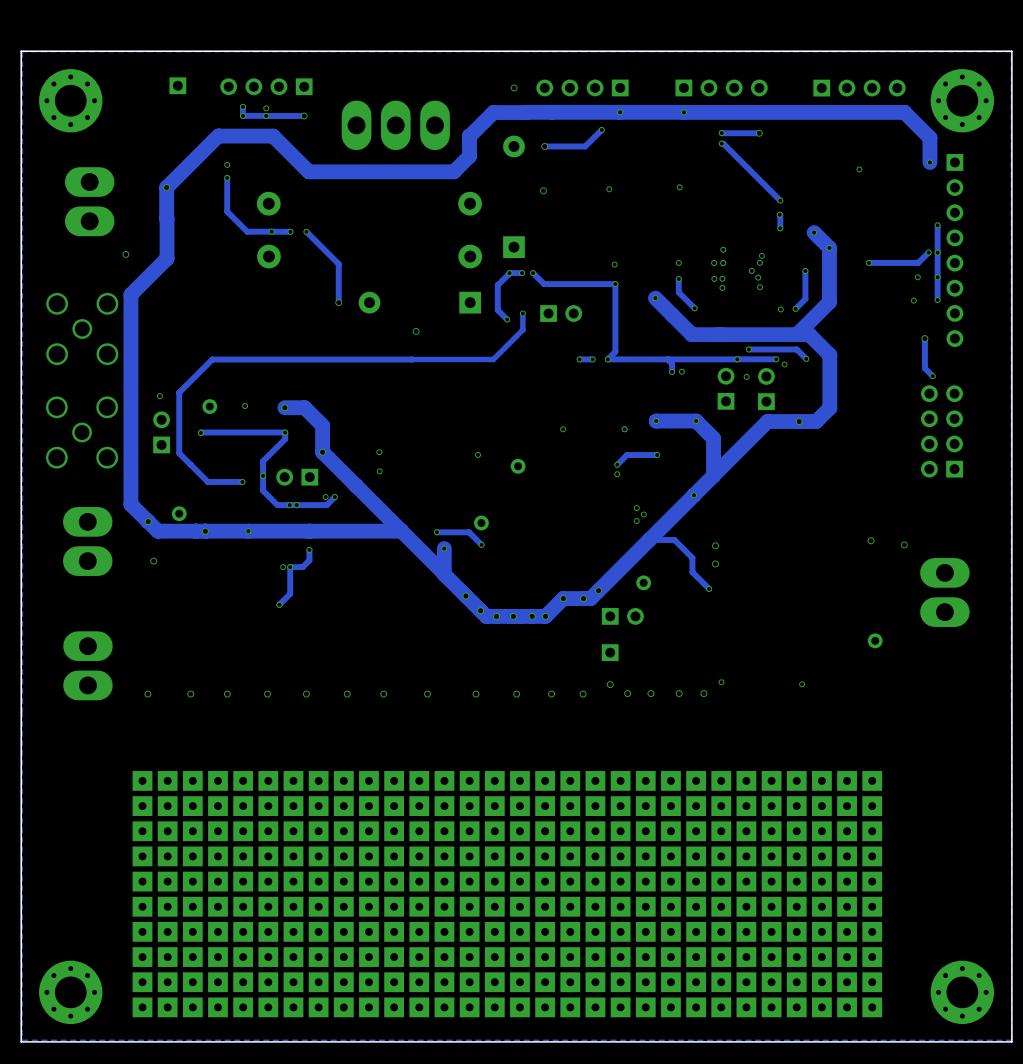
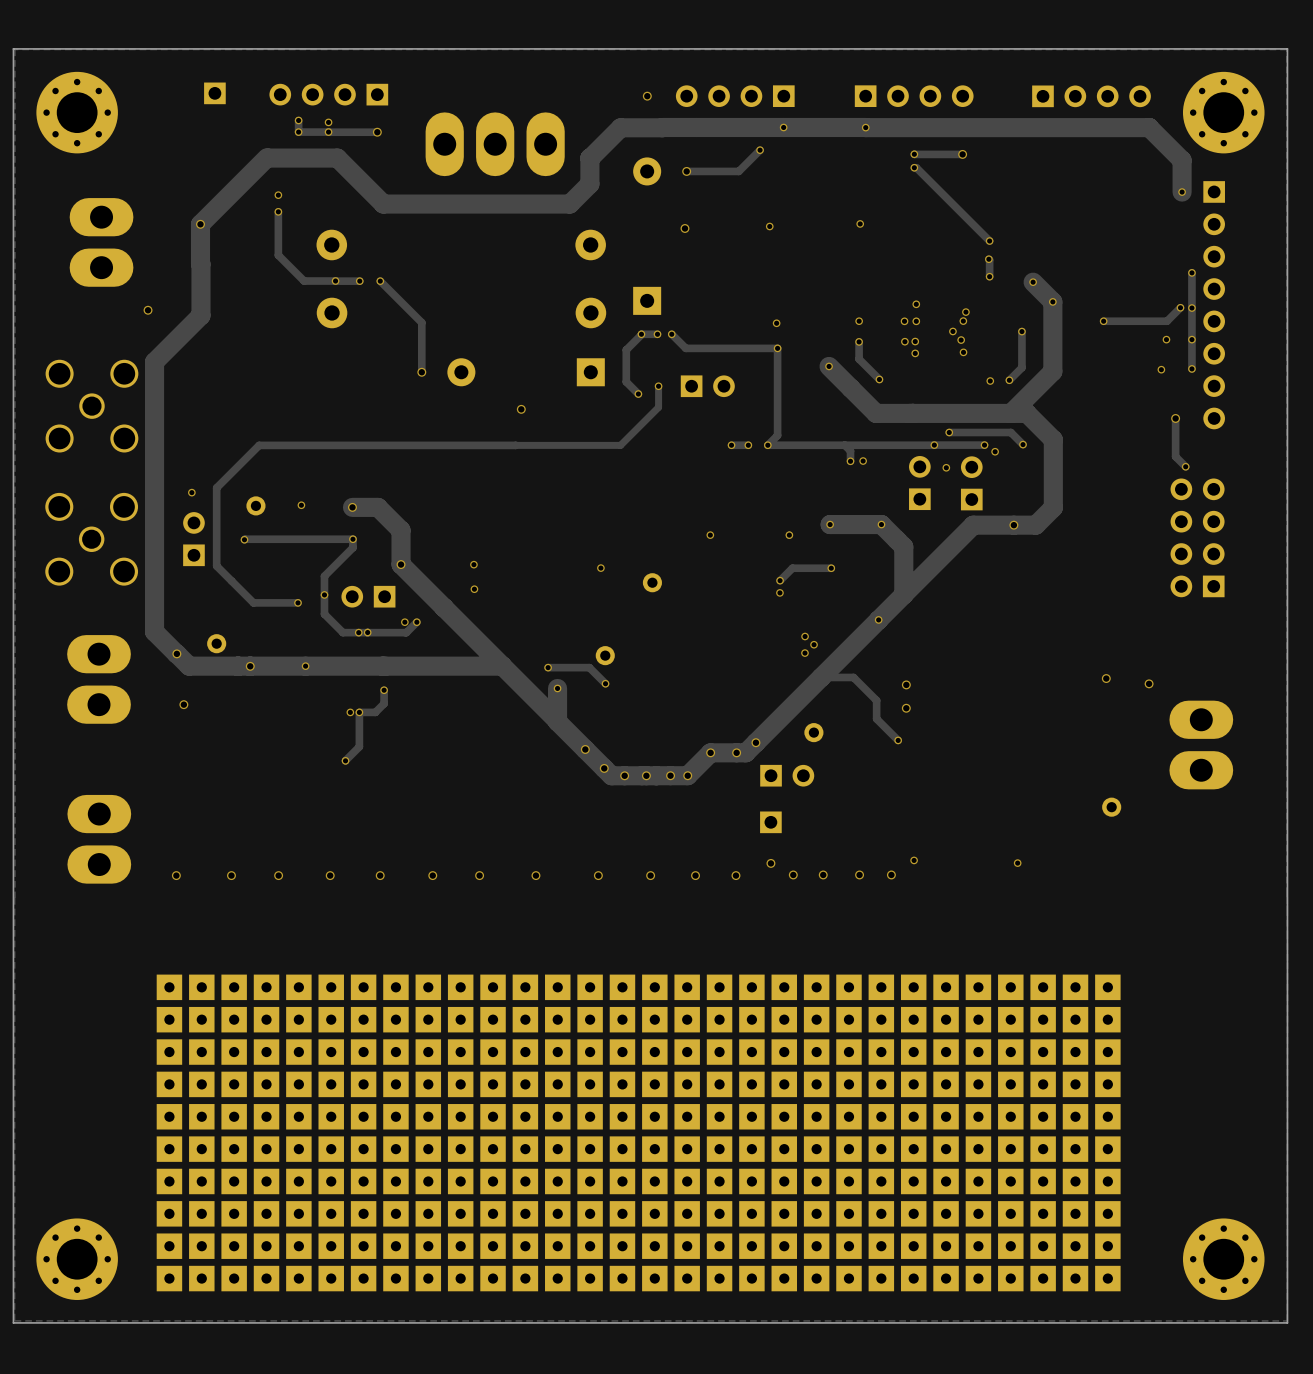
via: (859, 169) -> none

